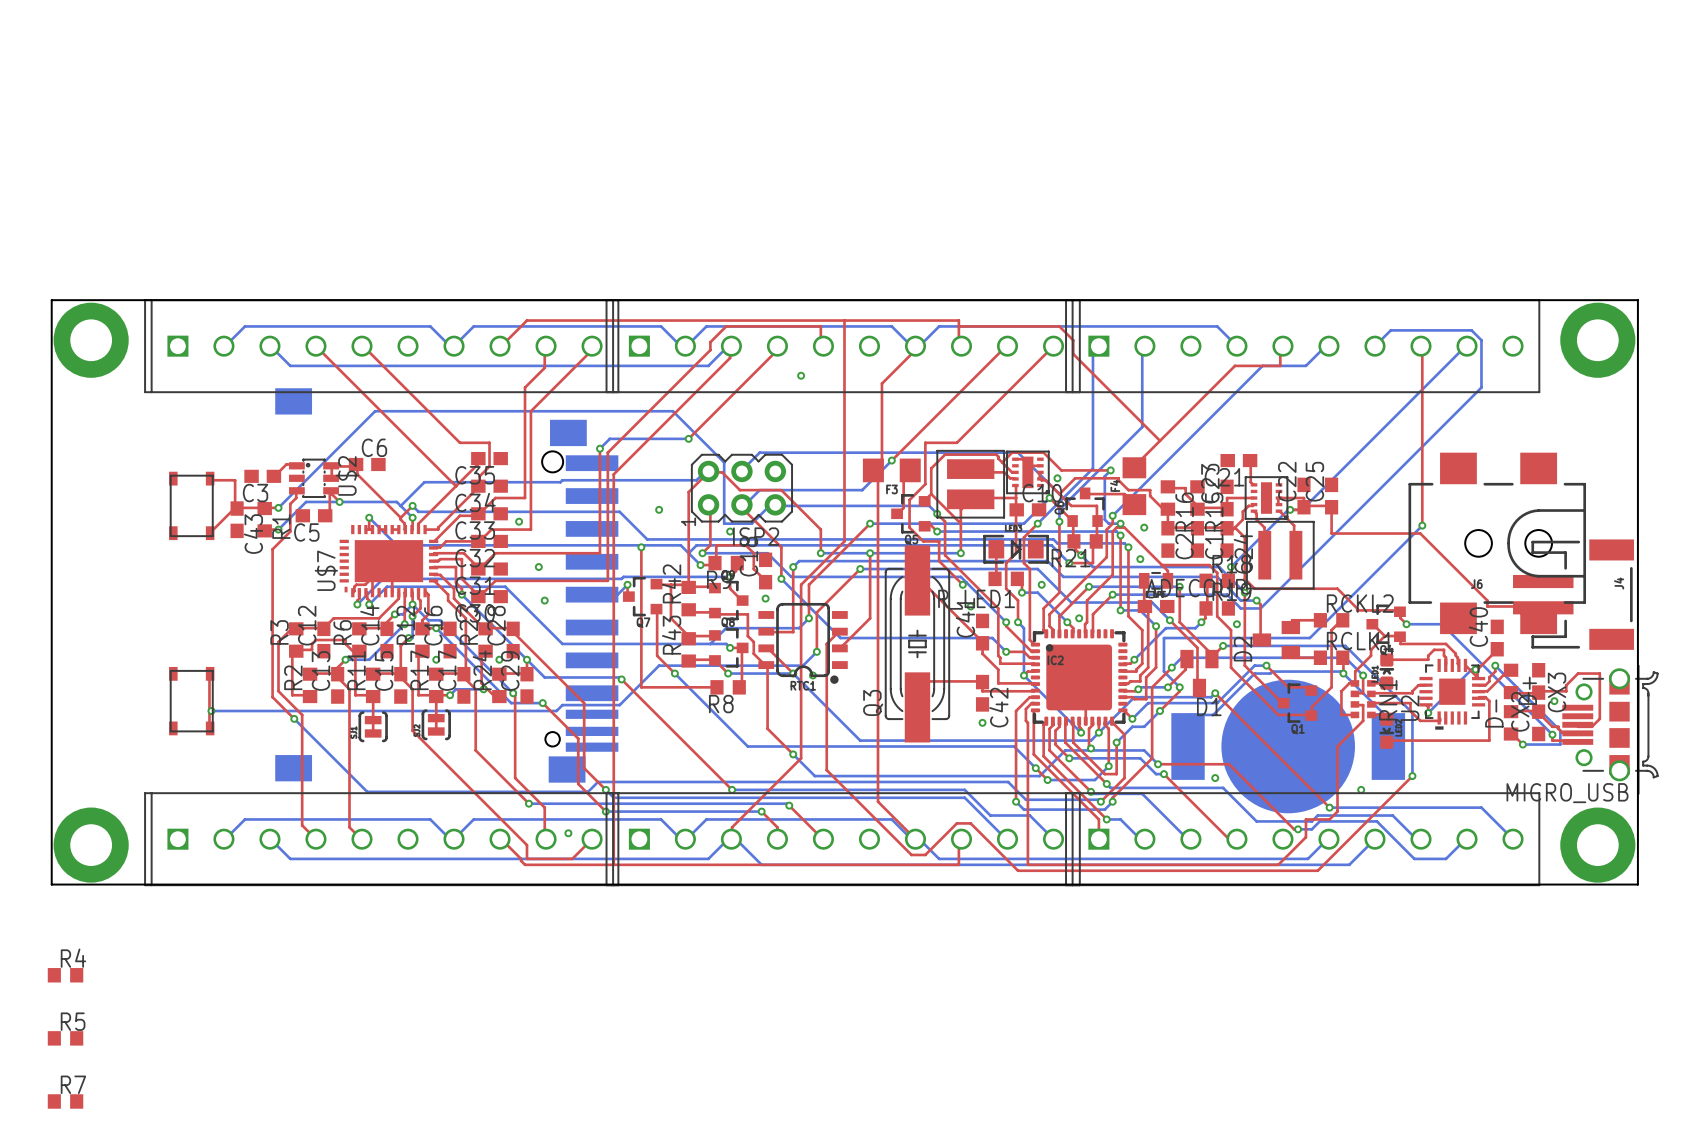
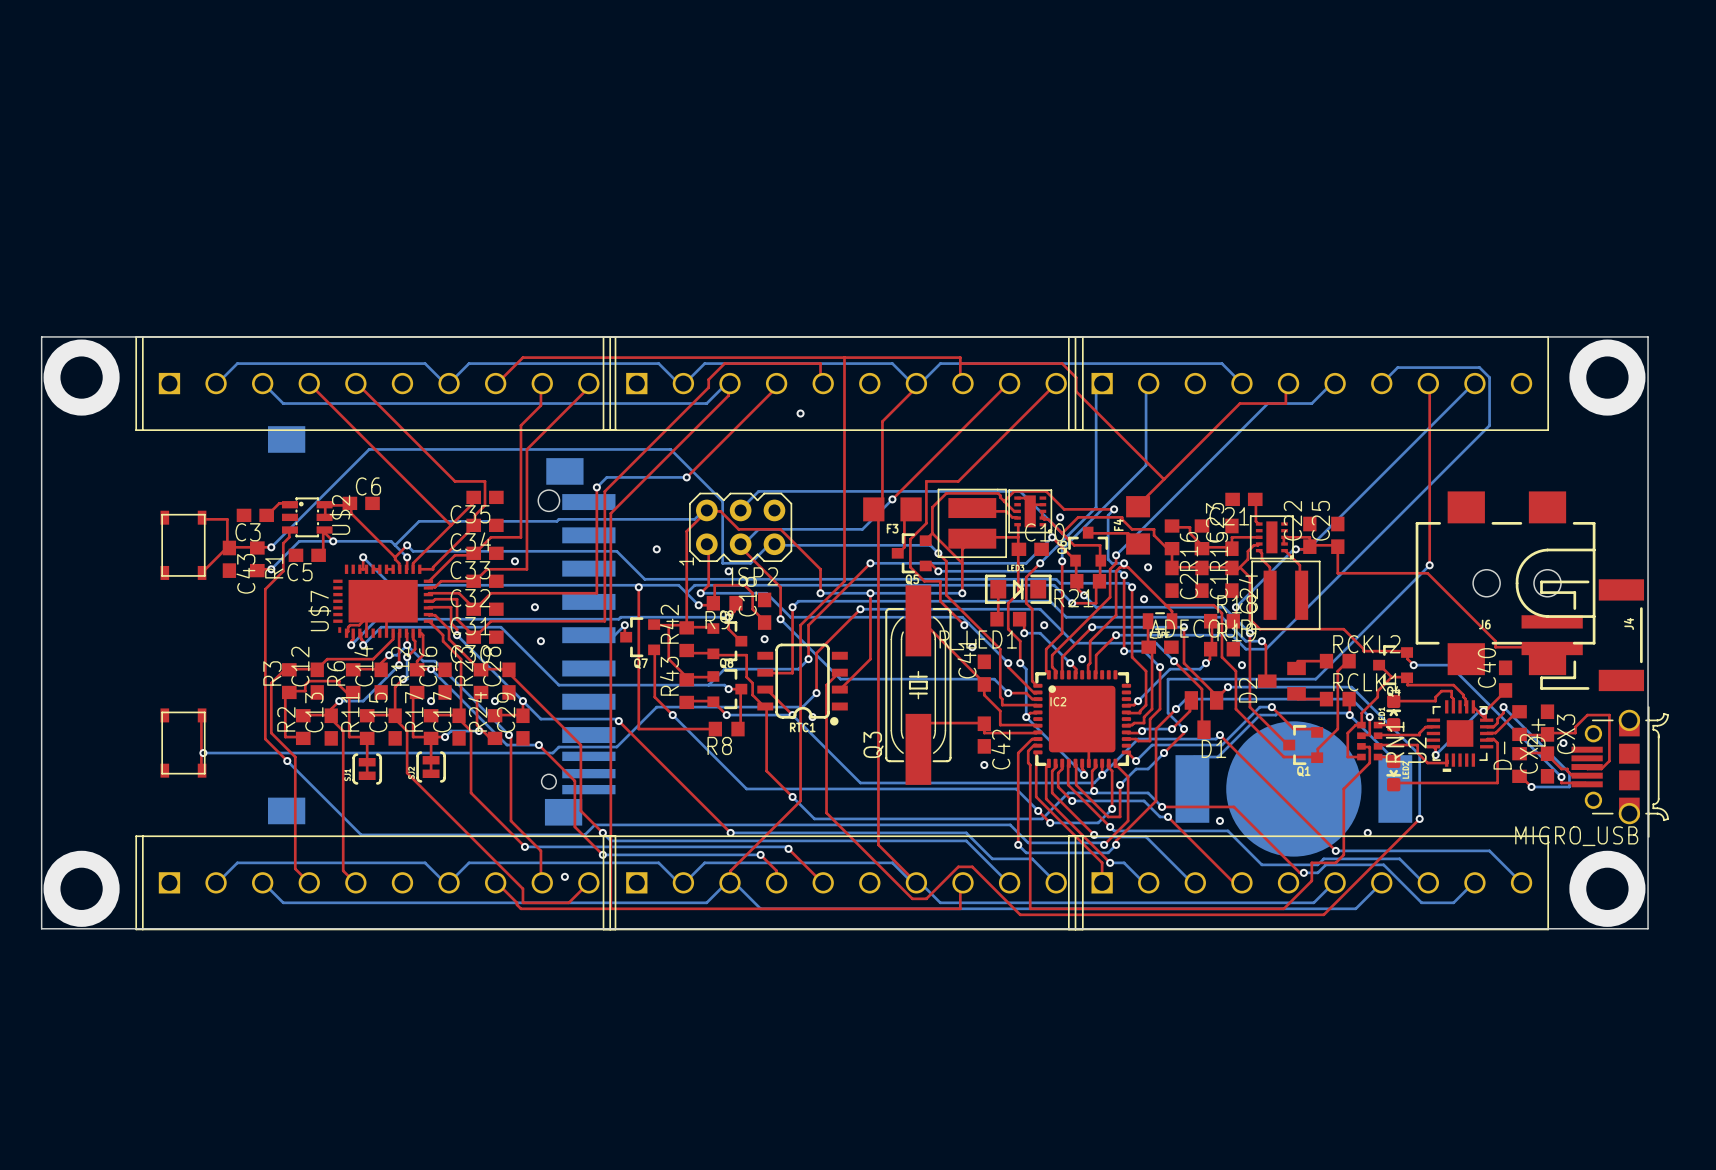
R4: (65, 975) -> none
R5: (65, 1038) -> none
R7: (65, 1101) -> none

